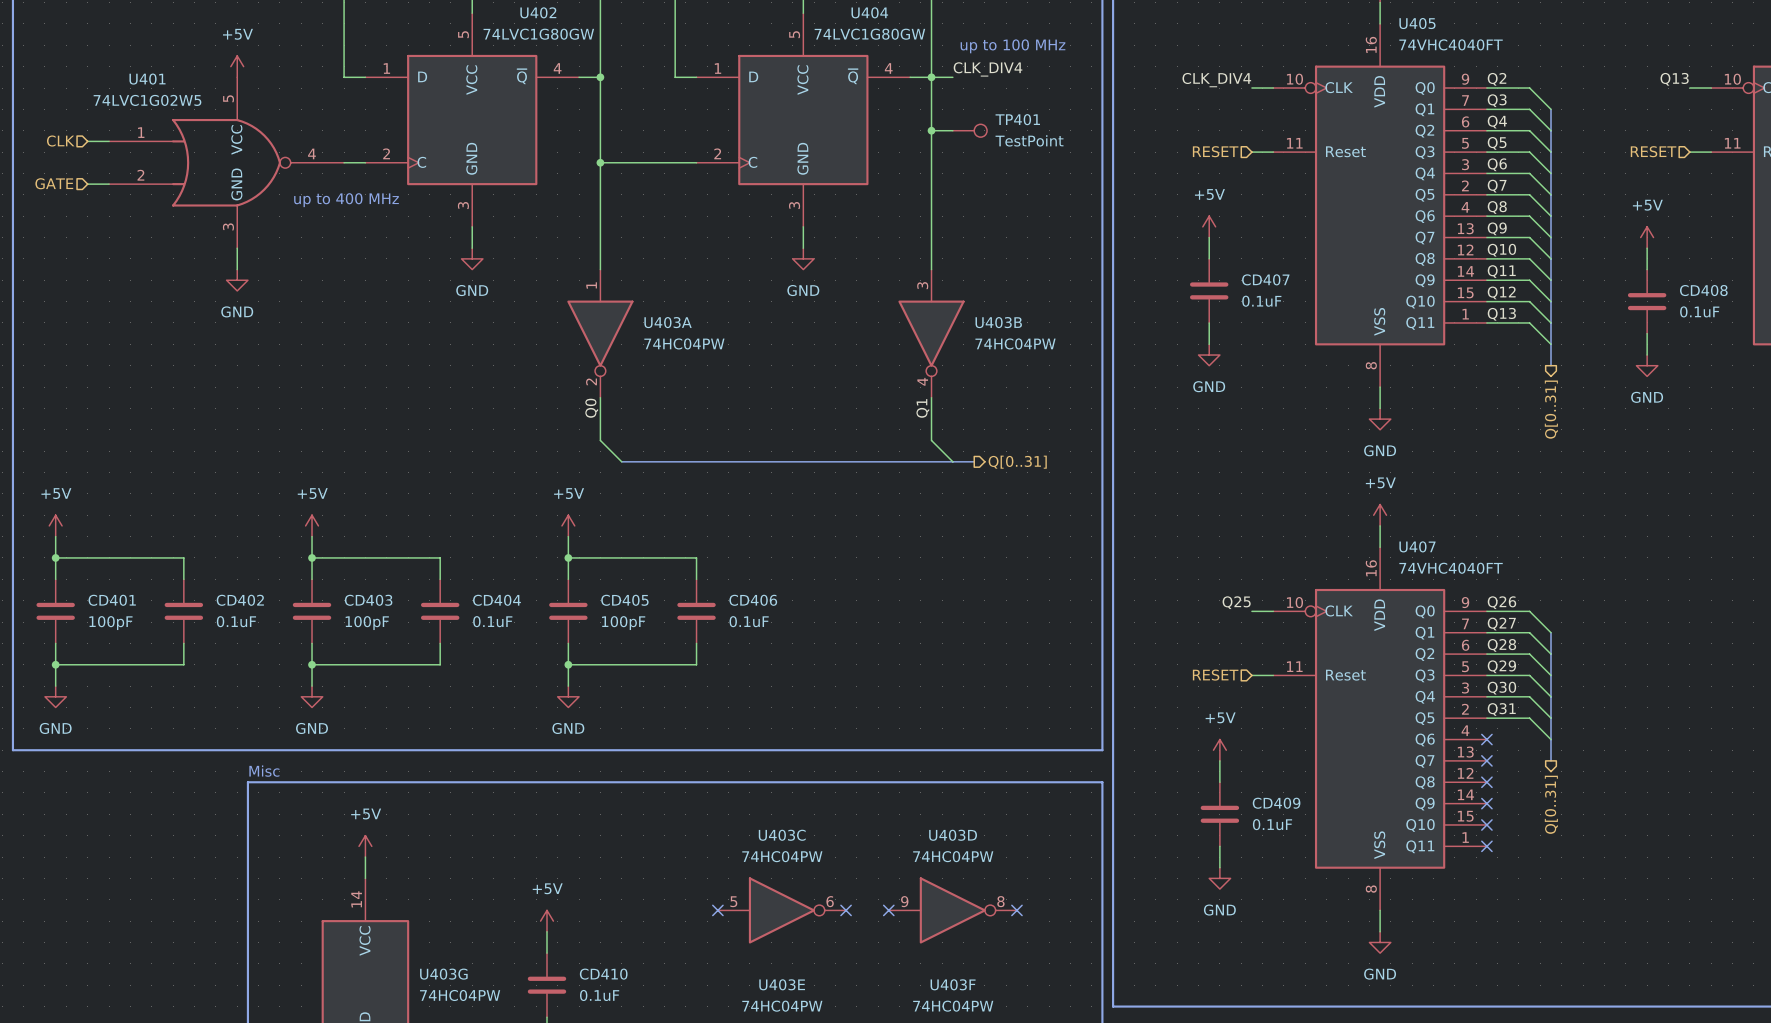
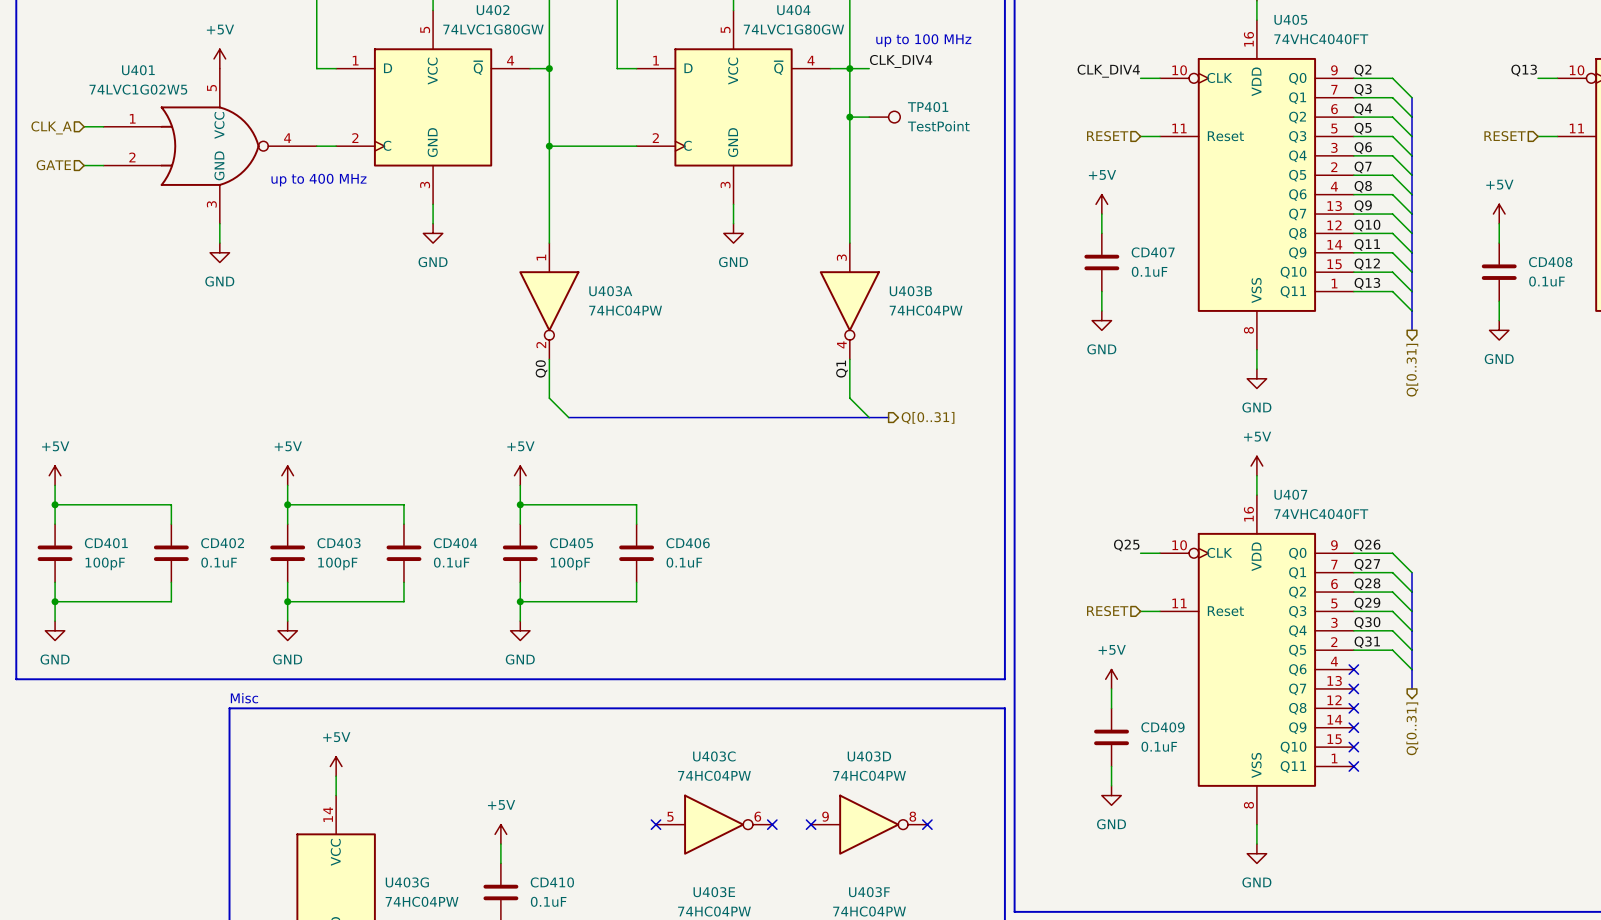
hierarchical label: CLK (60, 141) -> CLK_A (51, 127)

